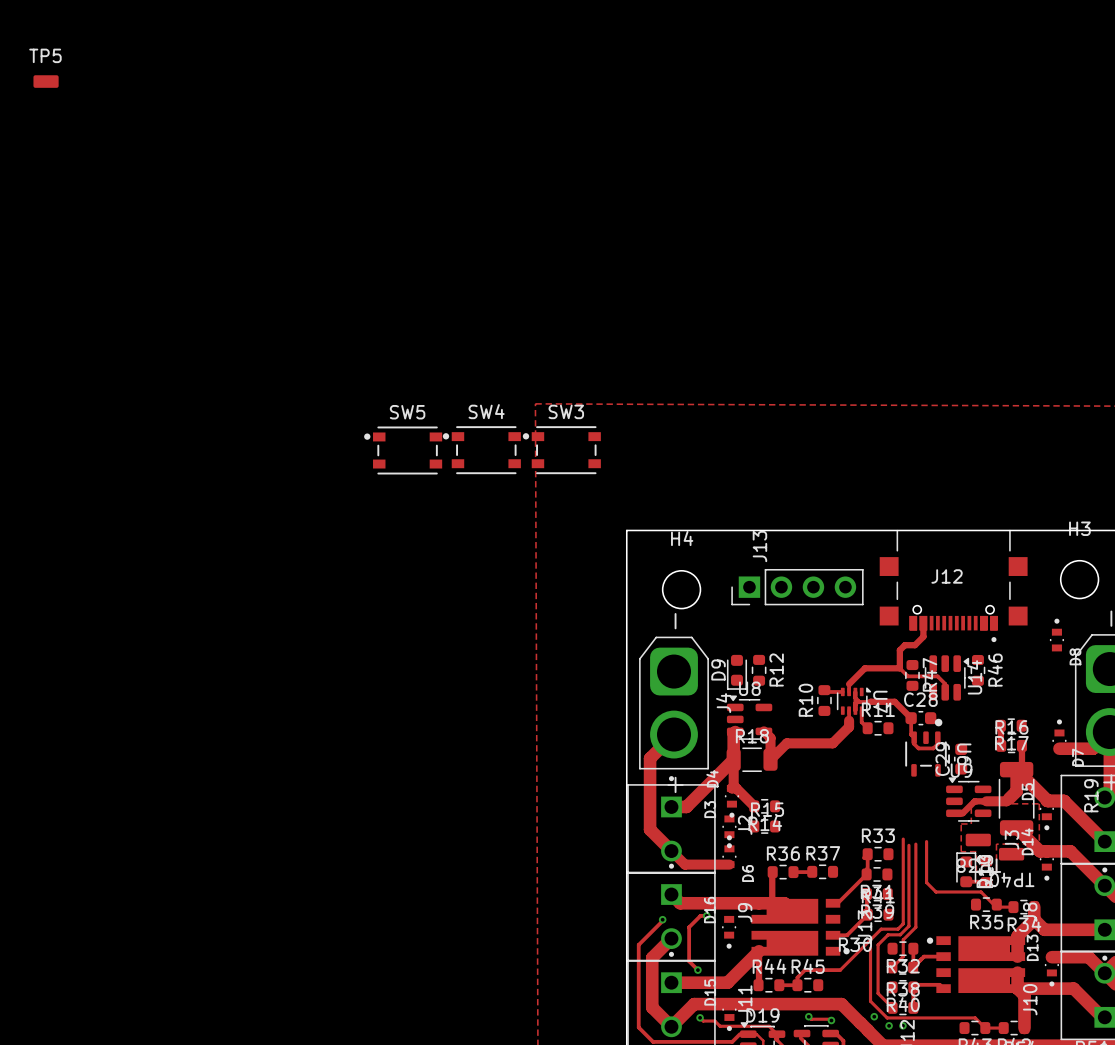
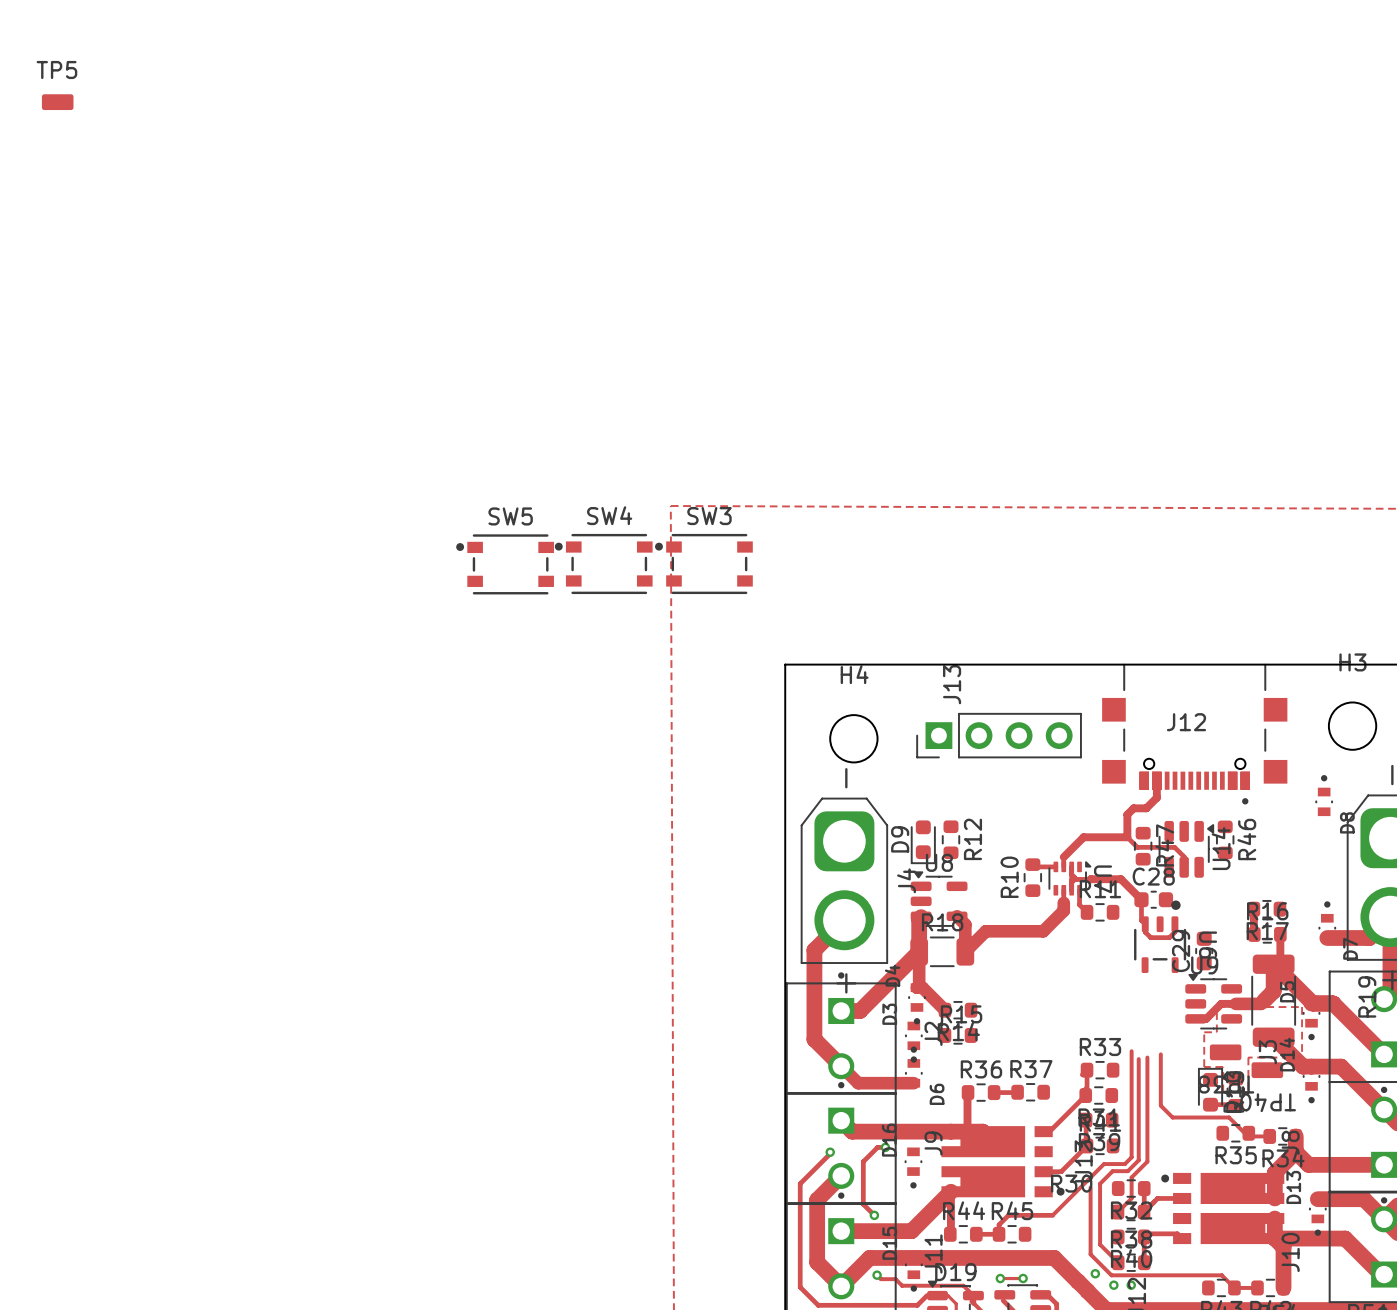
track: (808, 1016) (811, 1019) (831, 1020) -> none
via: (808, 1016) -> none
track: none -> (1000, 1278) (1023, 1278)
via: none -> (1000, 1278)
via: none -> (1023, 1278)
via: (831, 1020) -> none

